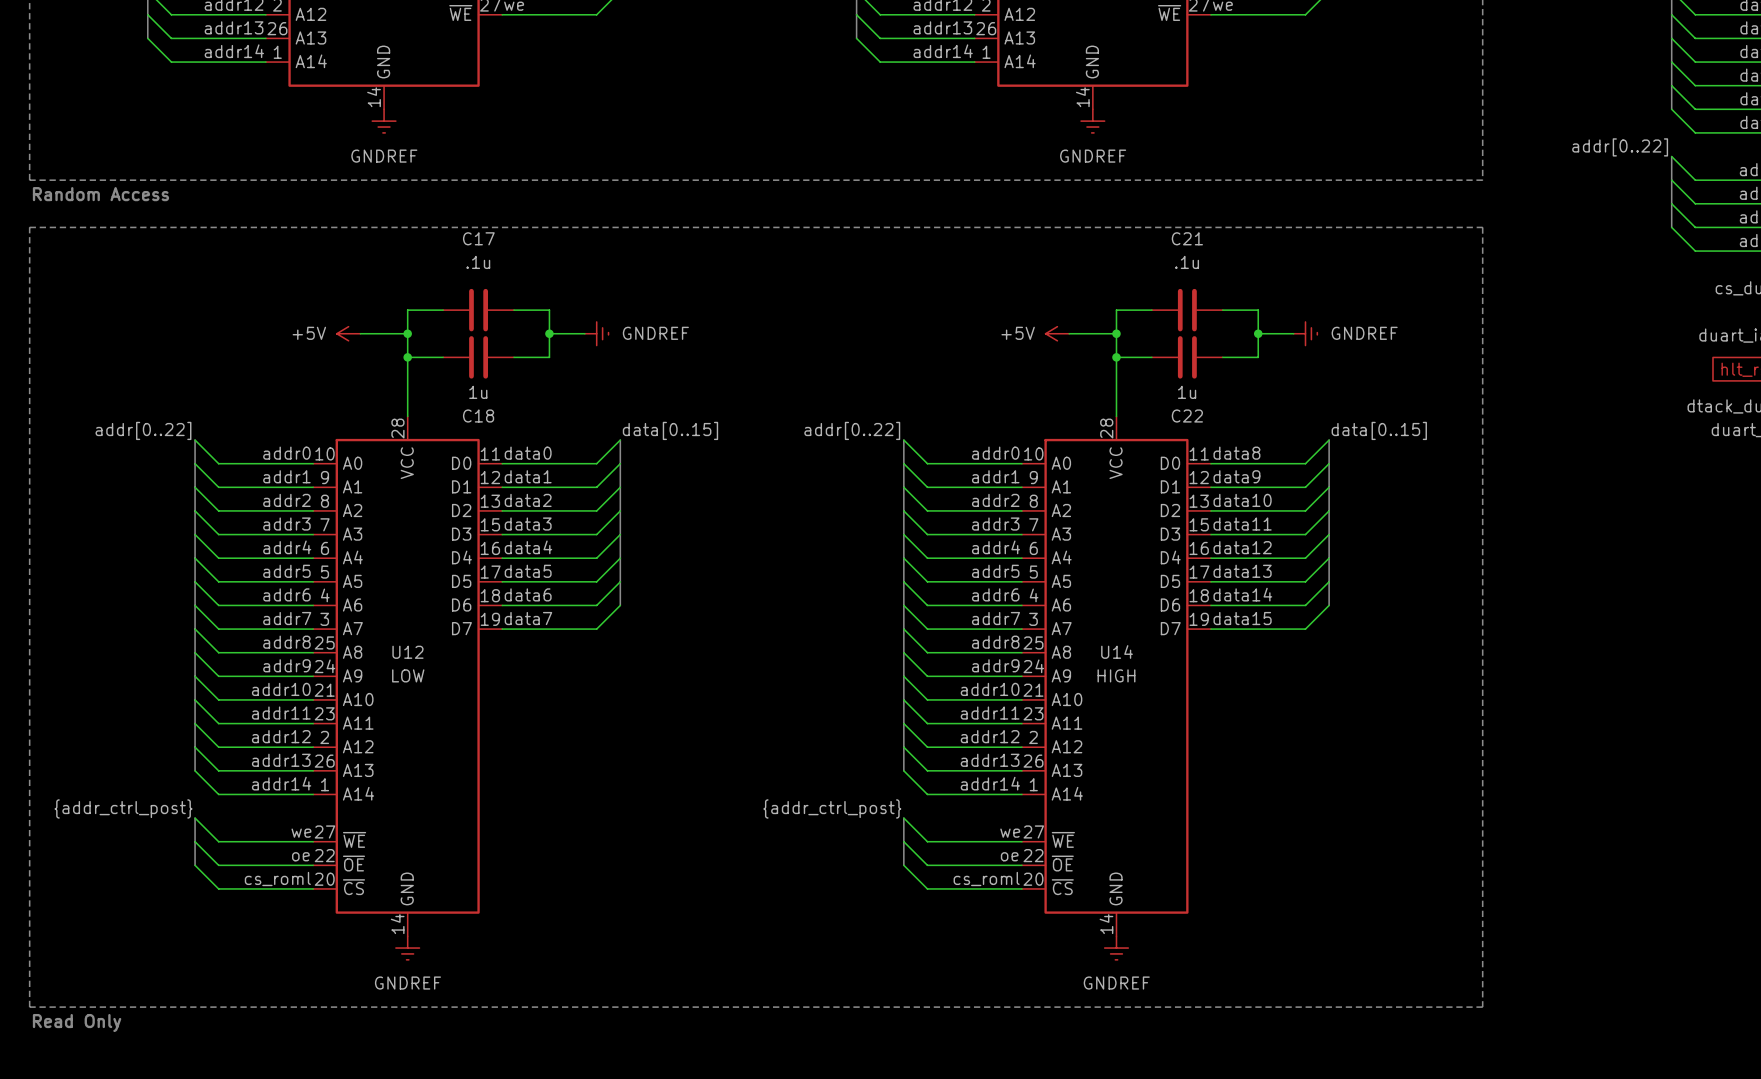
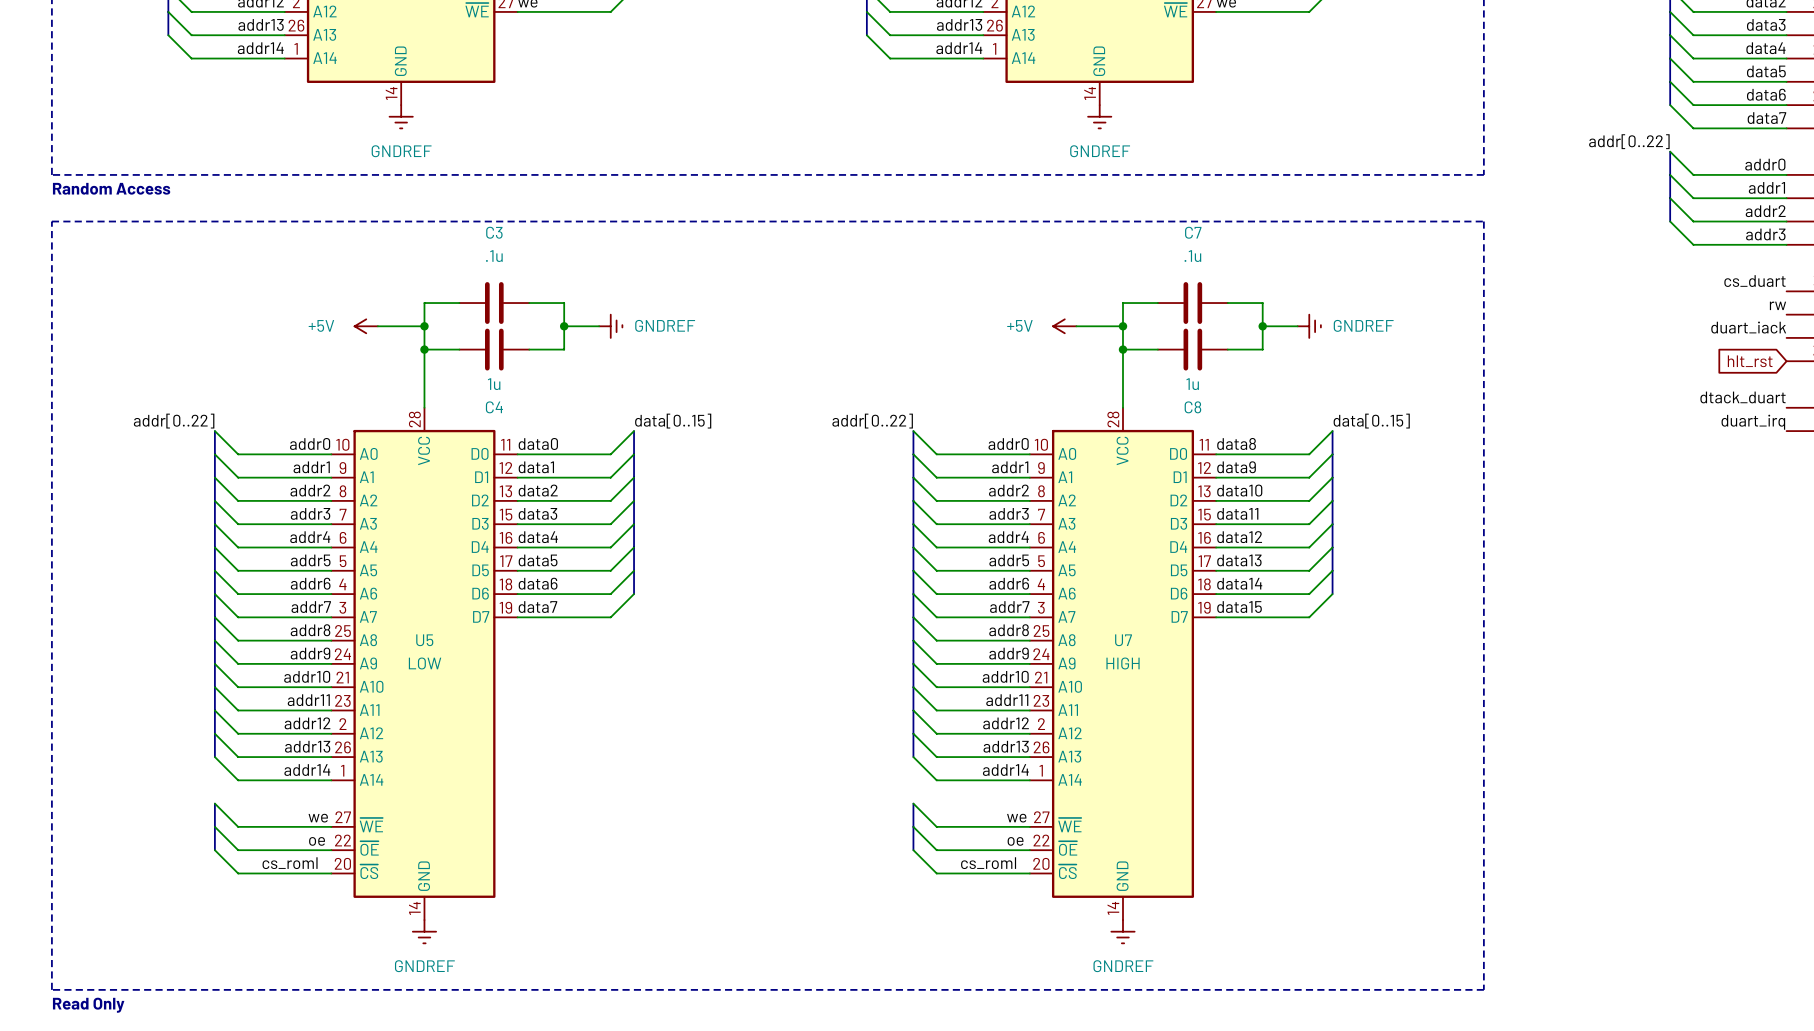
C17 name: C17 (478, 238) -> C3 (494, 232)
C21 name: C21 (1187, 238) -> C7 (1193, 232)
C18 name: C18 (478, 416) -> C4 (494, 407)
C22 name: C22 (1187, 416) -> C8 (1192, 407)
U14 name: U14 (1117, 651) -> U7 (1123, 640)
U12 name: U12 (407, 652) -> U5 (424, 640)
label: {addr_ctrl_post} (123, 808) -> none
label: {addr_ctrl_post} (832, 808) -> none

